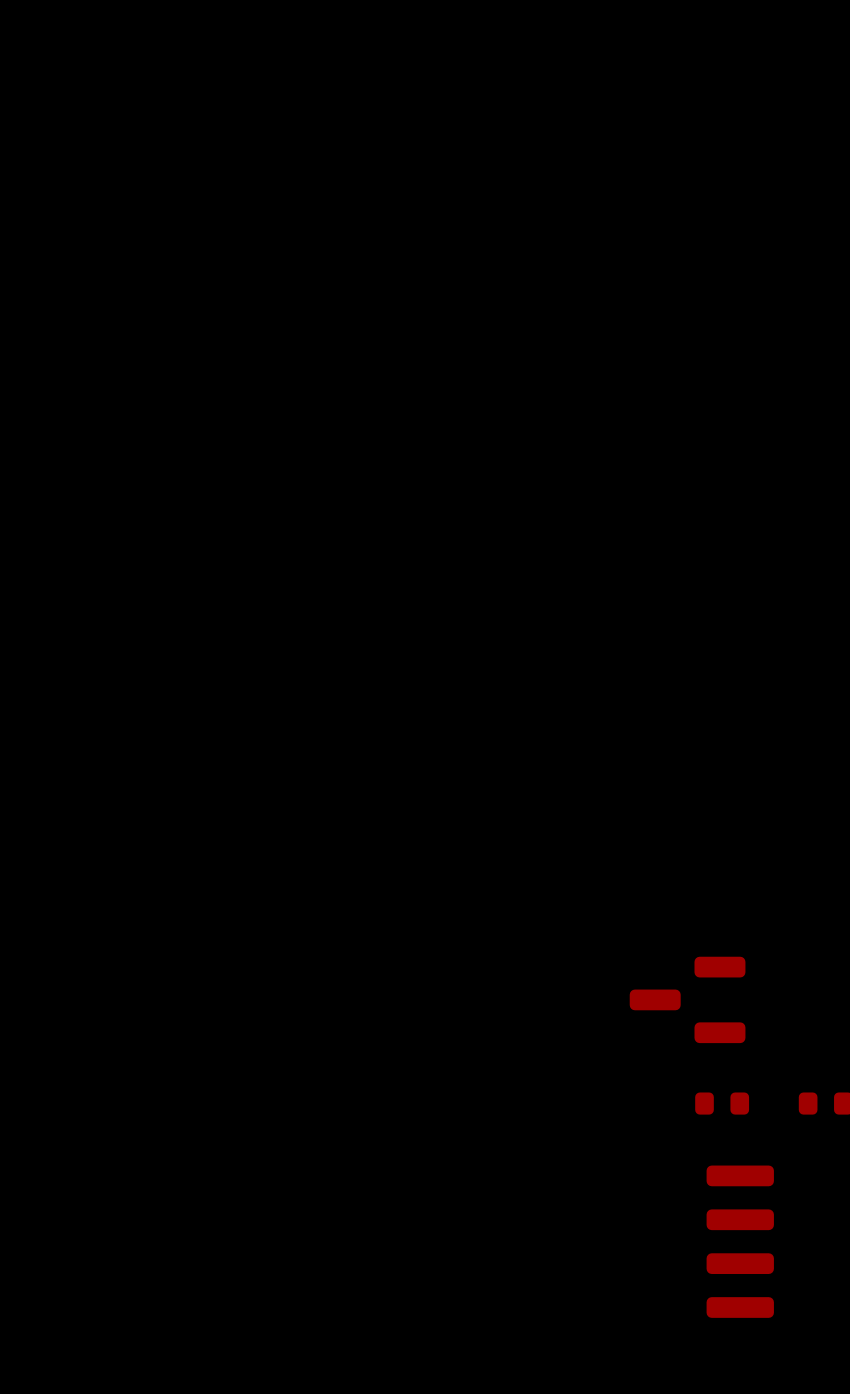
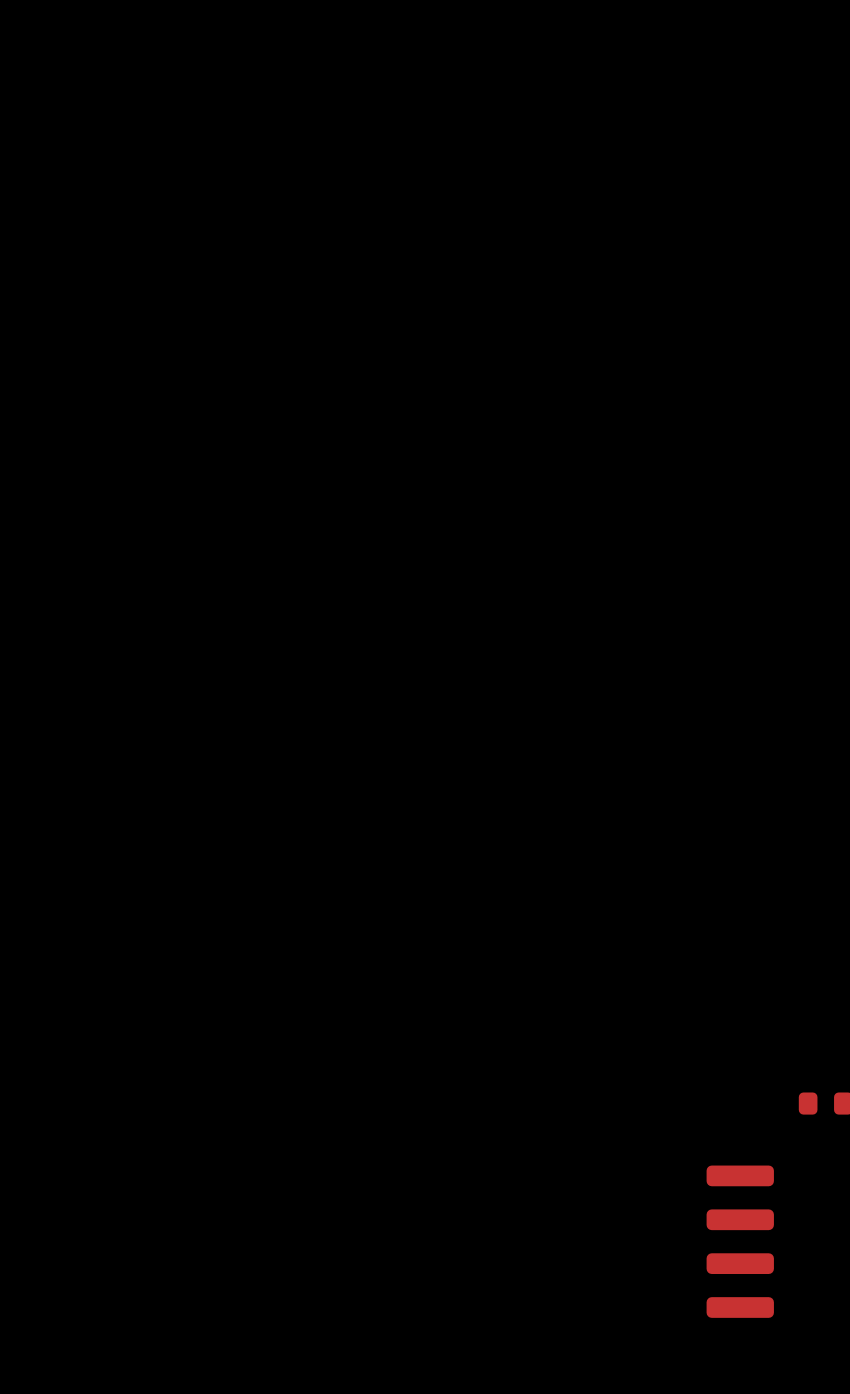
part: (687, 999) -> none
part: (722, 1103) -> none

